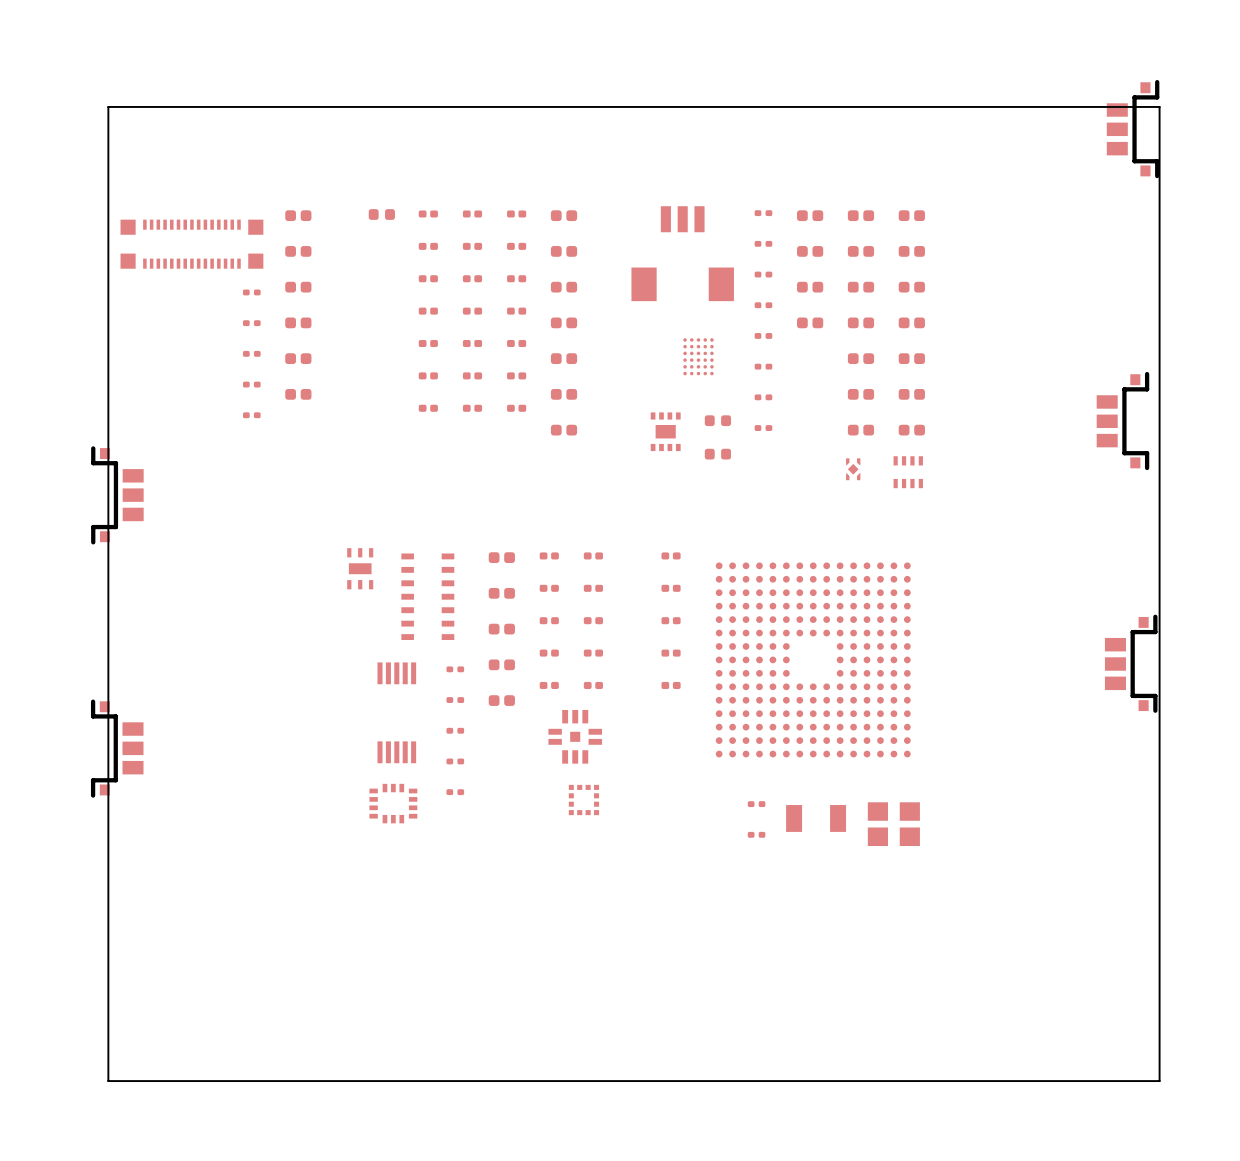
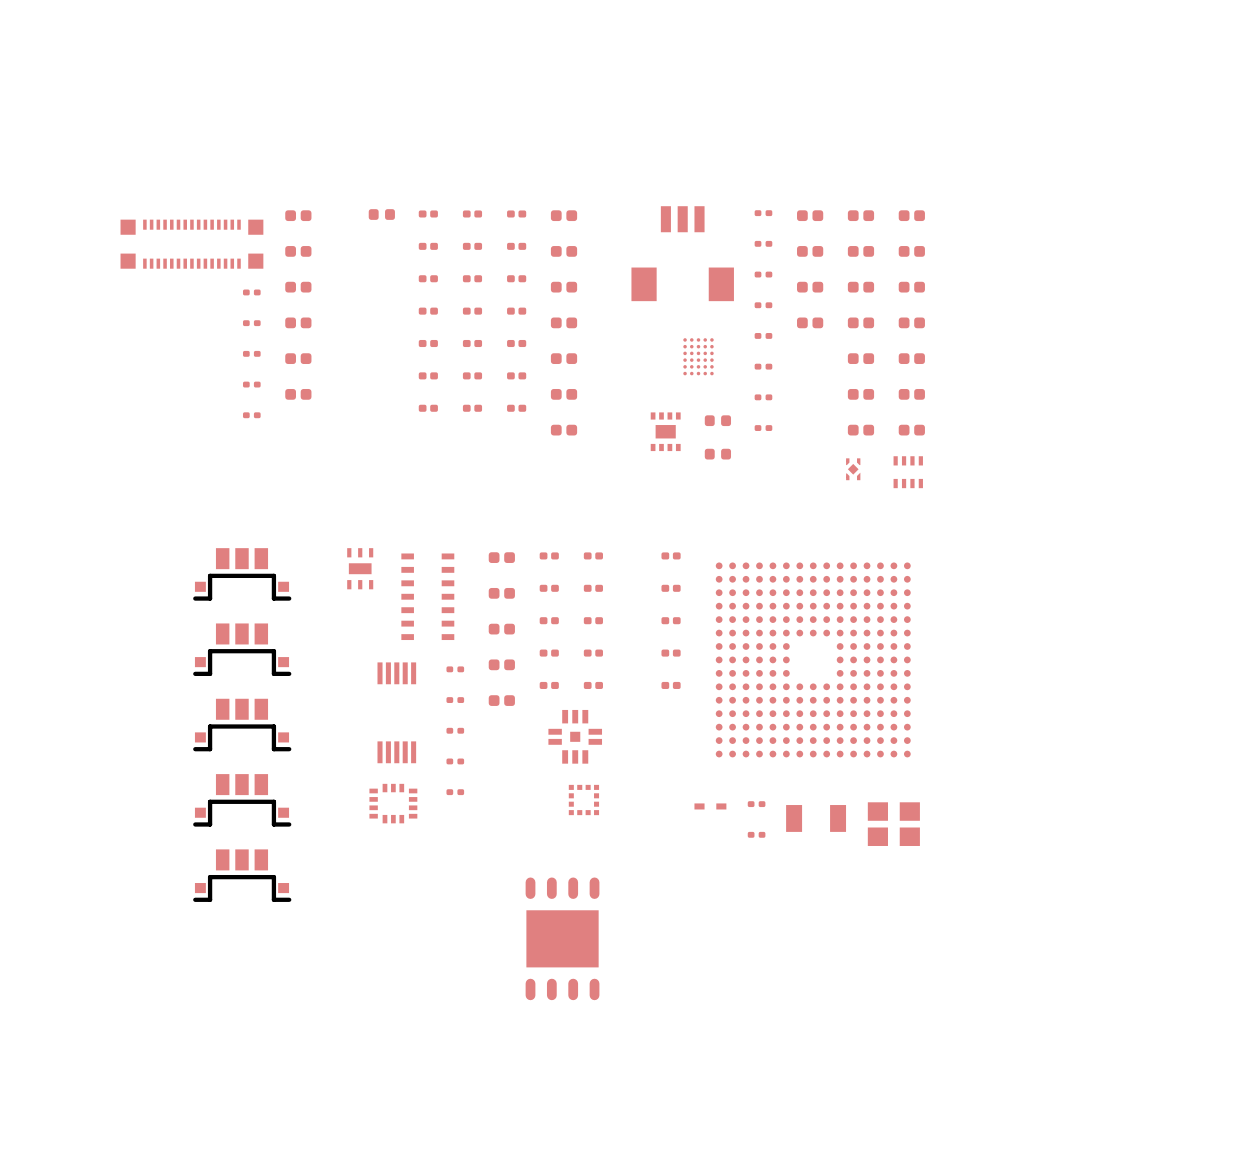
board edge: (1159, 106) (108, 106) (108, 1081) (1159, 1081) (1159, 106) -> none
part: (1133, 129) -> none
part: (1122, 421) -> none
part: (117, 495) -> none
part: none -> (242, 574)
part: none -> (242, 649)
part: (1131, 663) -> none
part: none -> (242, 725)
part: (117, 748) -> none
part: none -> (242, 800)
part: none -> (710, 806)
part: none -> (242, 875)
part: none -> (562, 938)

